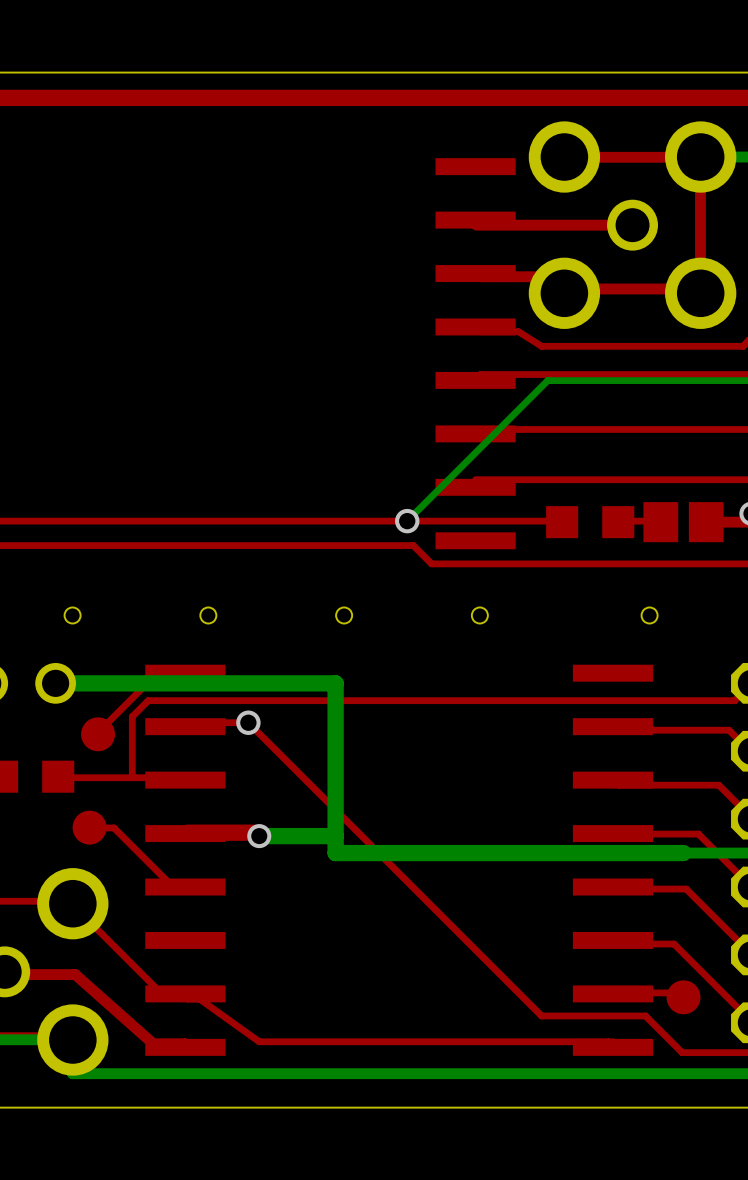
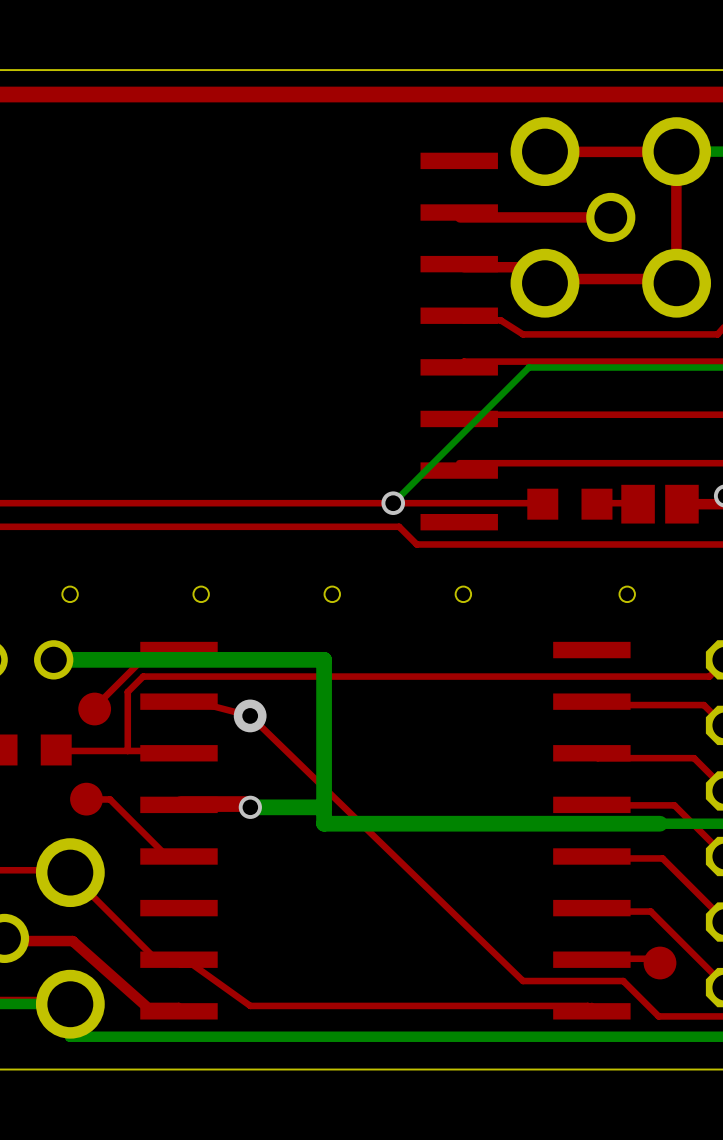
top track: (187, 722) (248, 722) (541, 1015) -> (180, 697) (250, 715) (523, 981)
via position: (248, 722) -> (250, 715)

